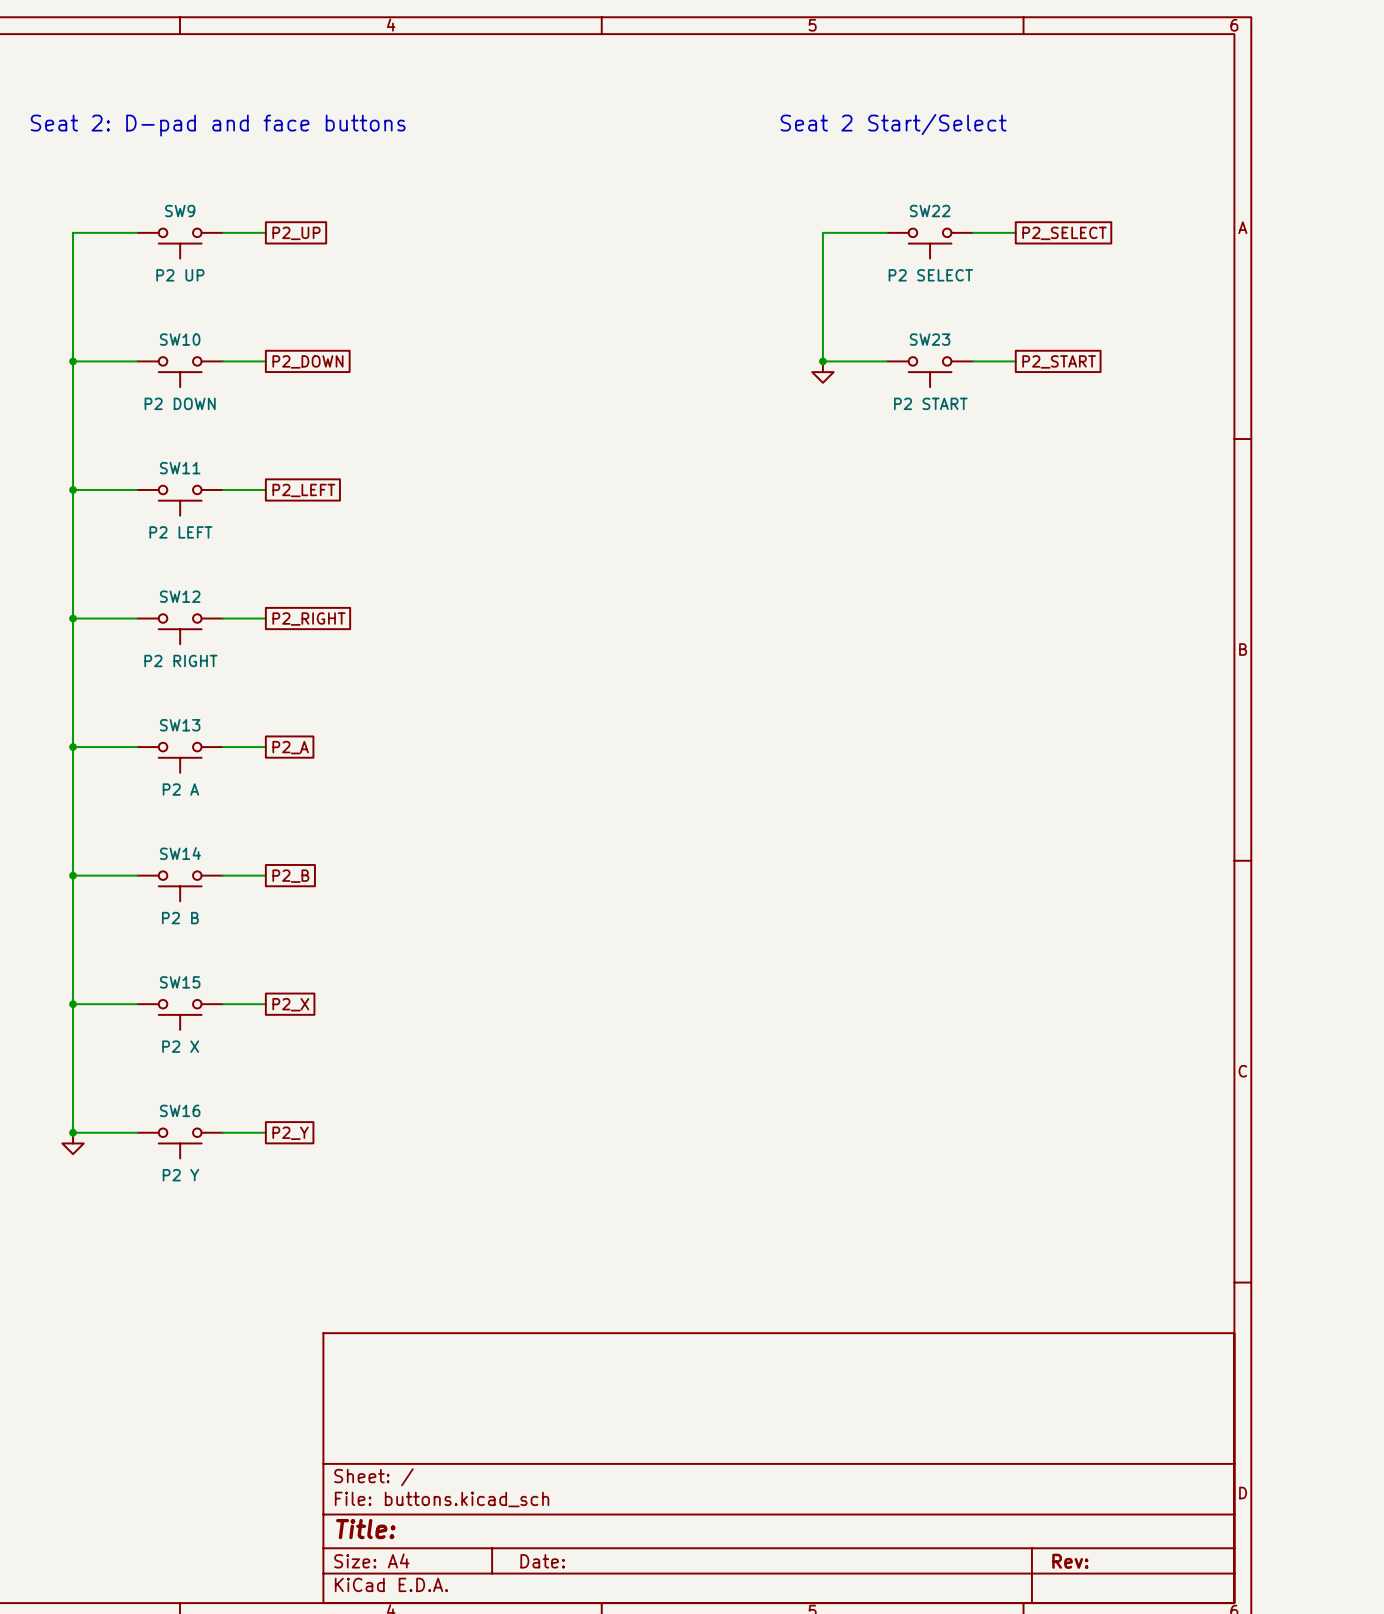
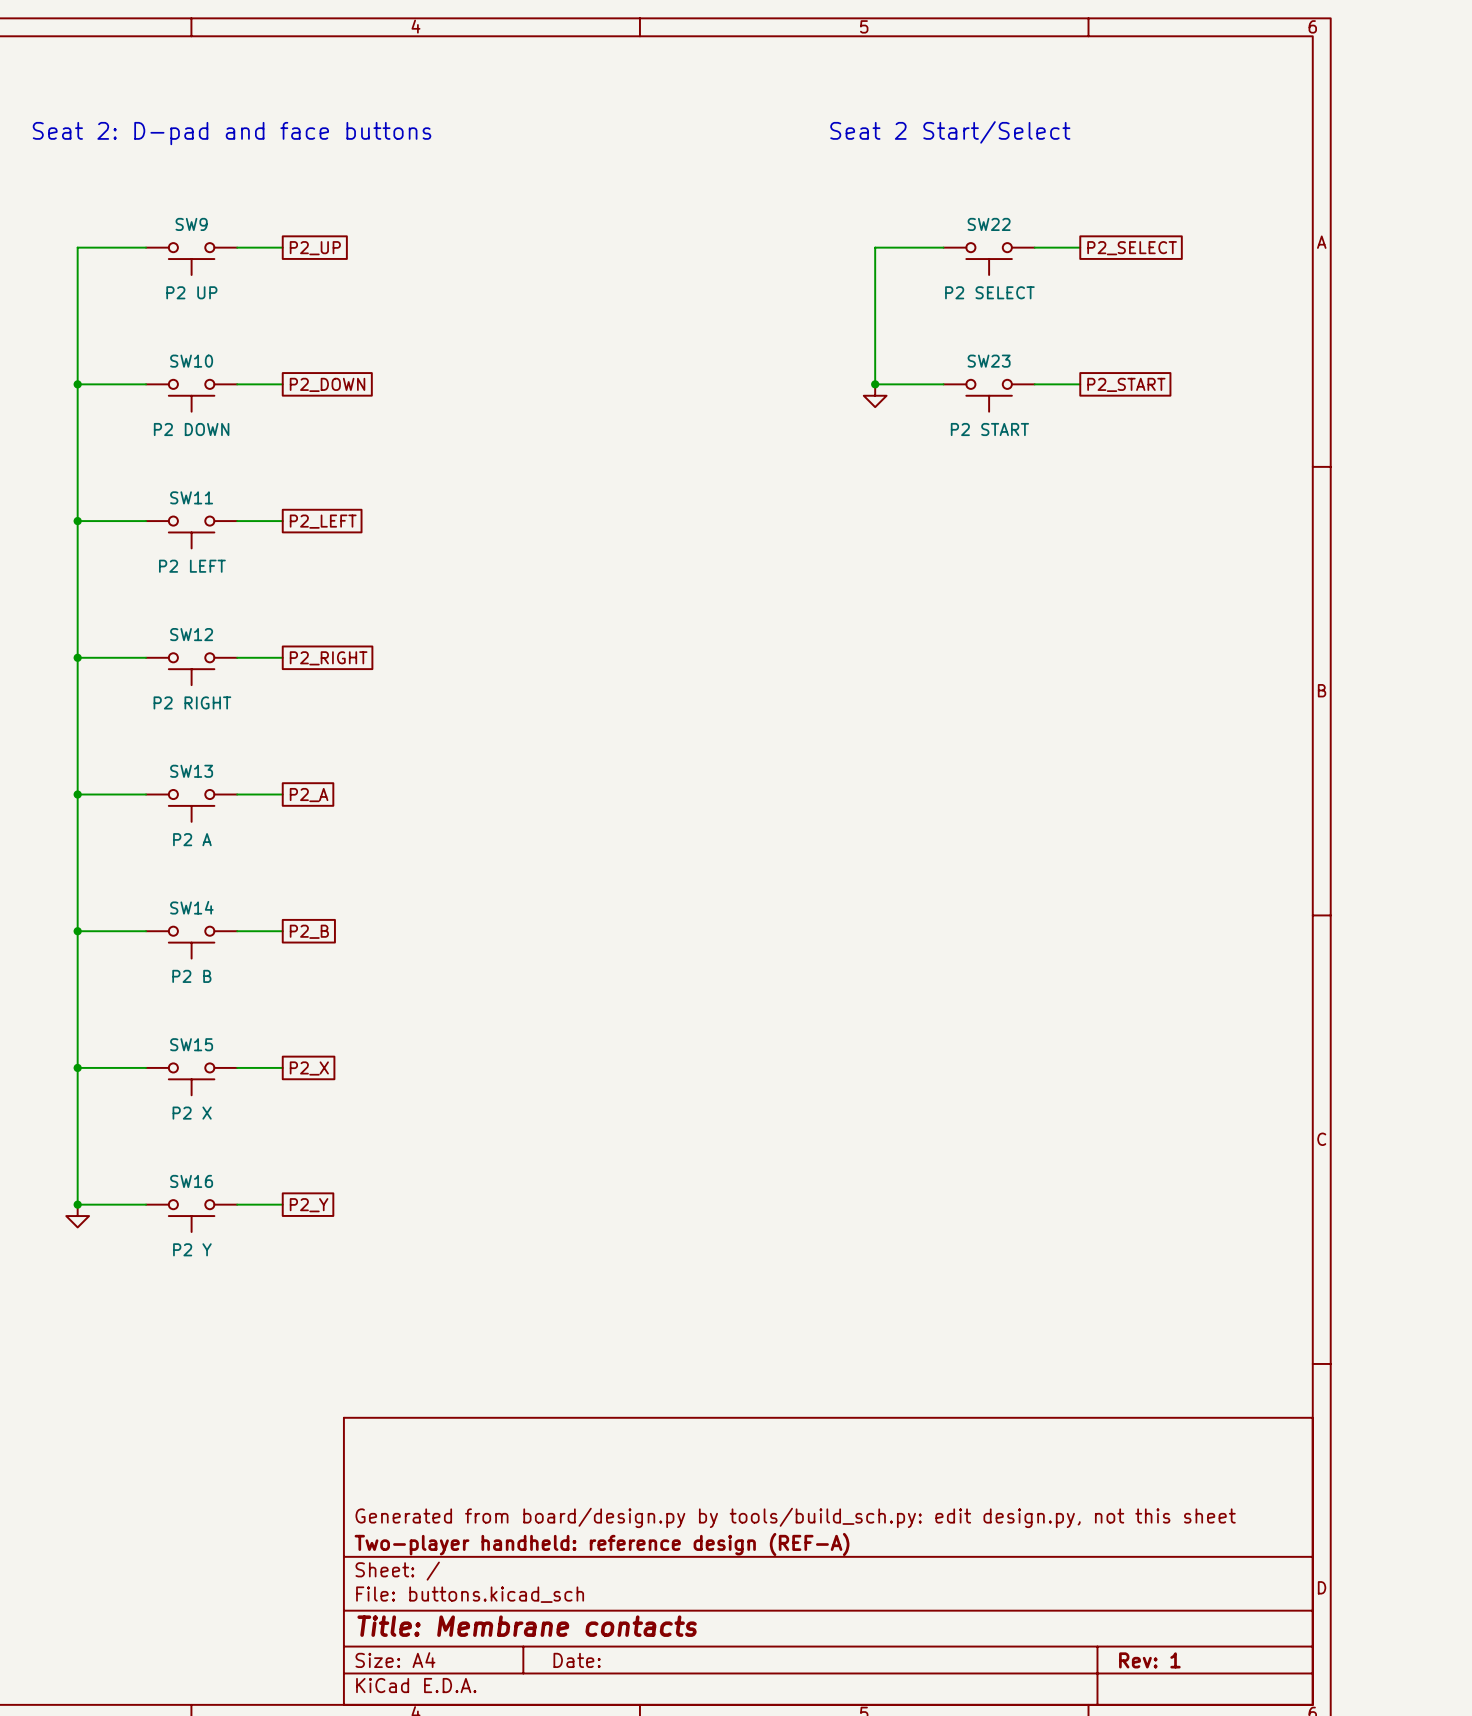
title block: none -> Generated from board/design.py by tools/build_sch.py: edit design.py, not this sheet (795, 1517)
title block: none -> Two-player handheld: reference design (REF-A) (602, 1544)
title block: Title: (365, 1529) -> Title: Membrane contacts (527, 1626)
title block: Rev: (1070, 1561) -> Rev: 1 (1149, 1660)

